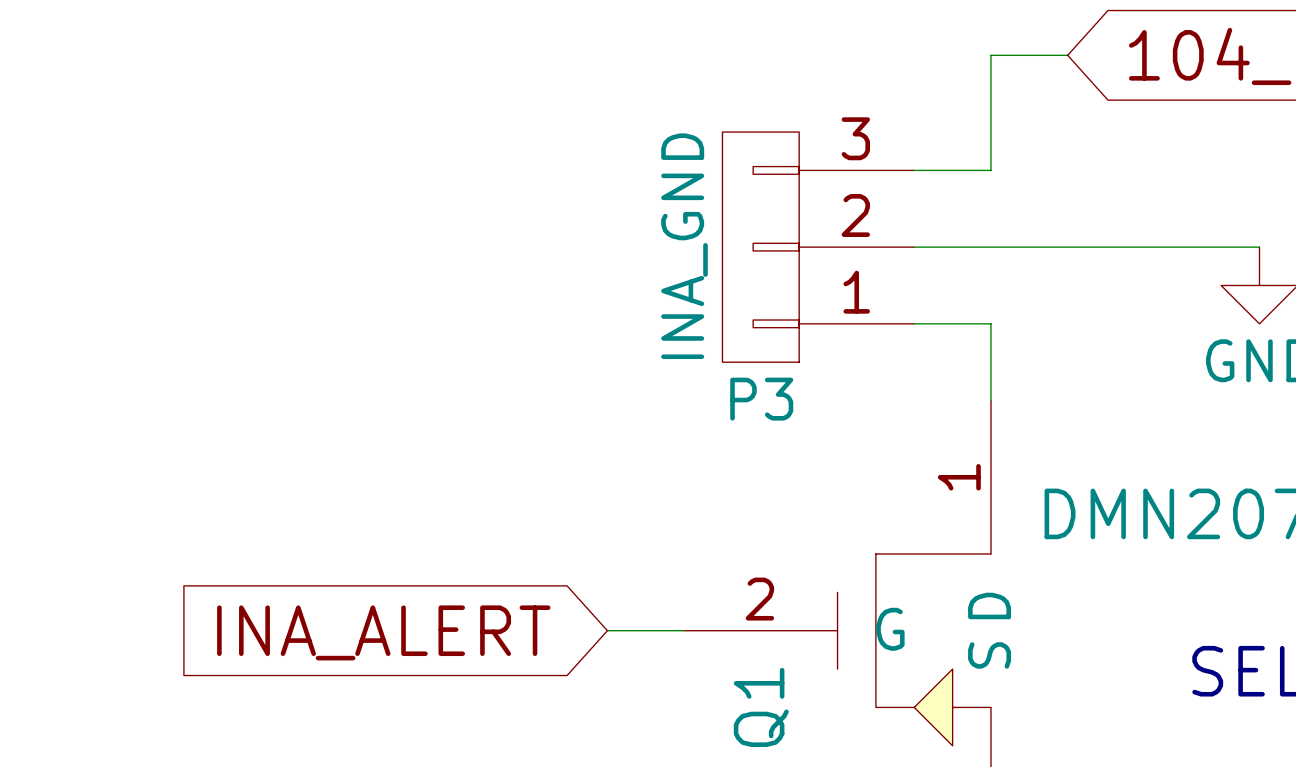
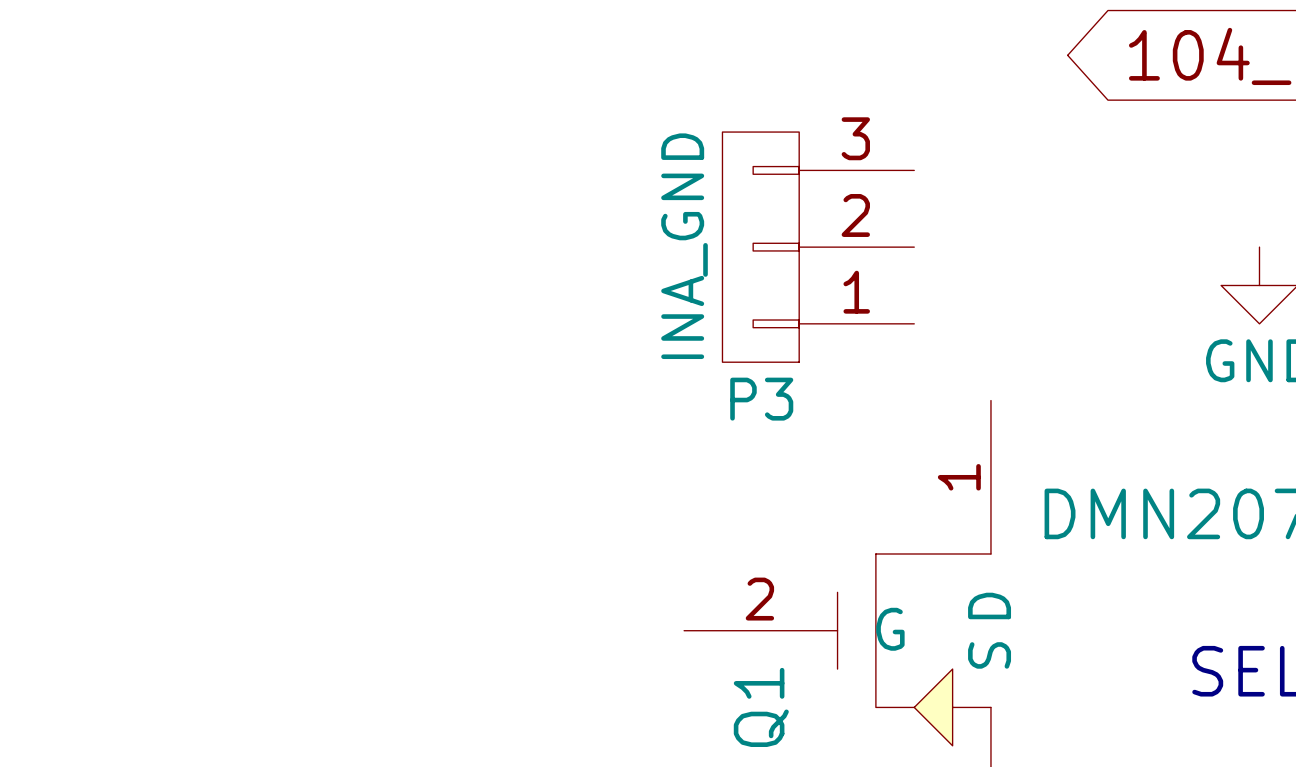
wire: (1067, 55) (990, 55) (990, 170) (914, 170) -> none
wire: (914, 247) (1259, 247) -> none
wire: (914, 323) (990, 323) (990, 400) -> none
wire: (607, 630) (684, 630) -> none
global label: INA_ALERT (383, 632) -> none

